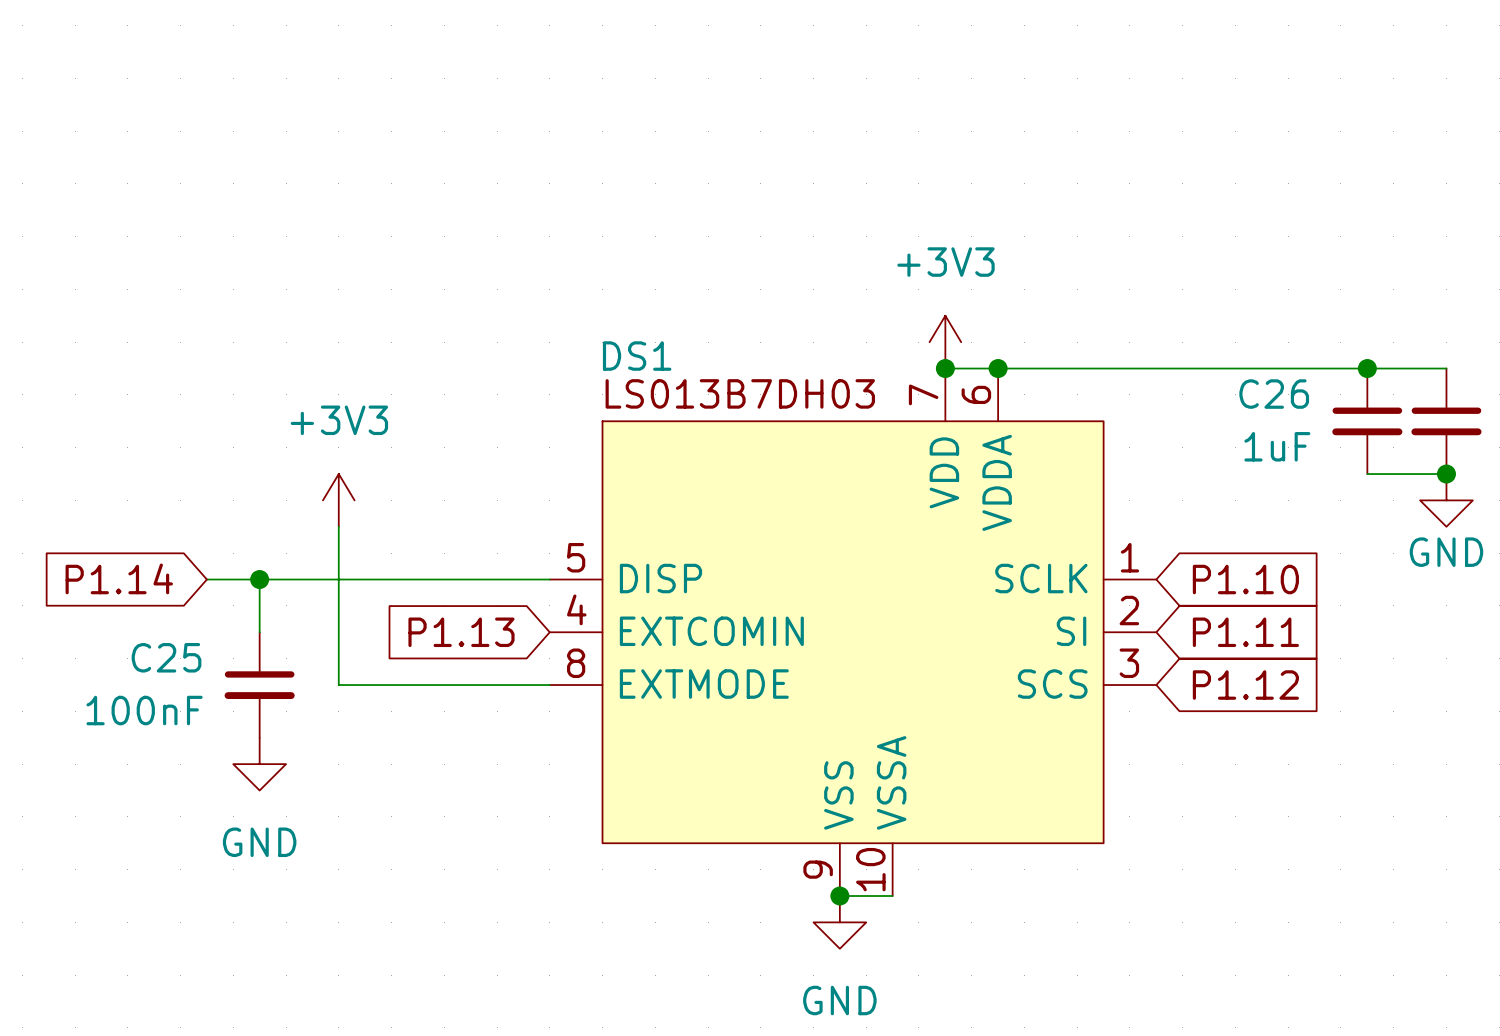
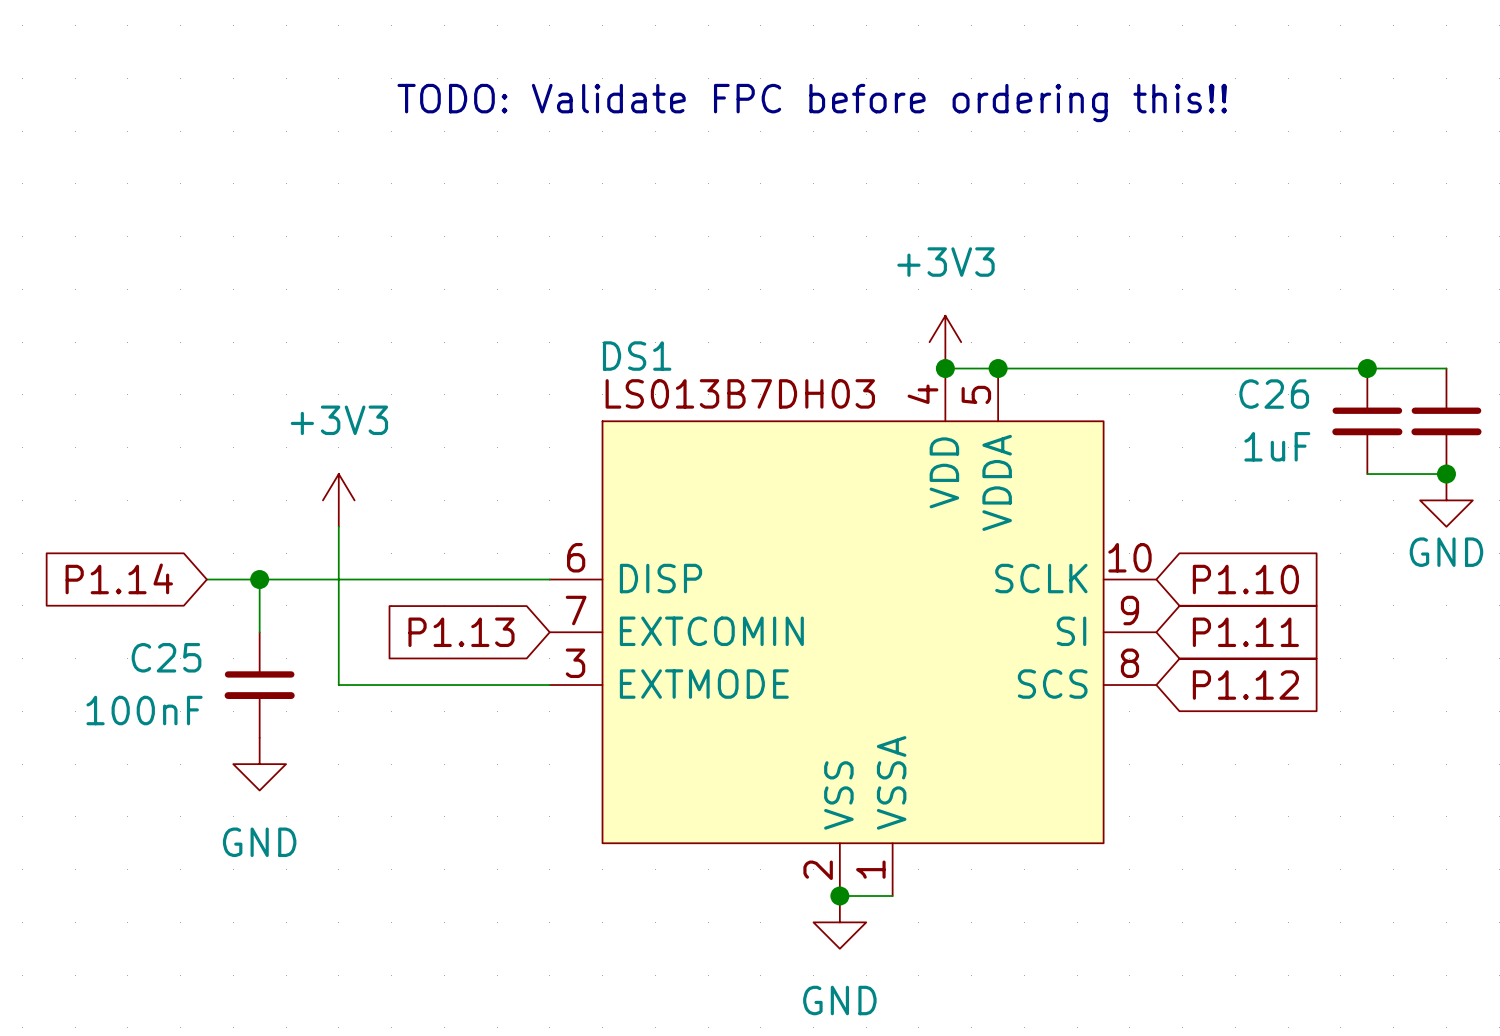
text: none -> TODO: Validate FPC before ordering this!! (812, 103)
DS1 symbol: [549, 368, 1157, 897] -> [549, 368, 1157, 897]

